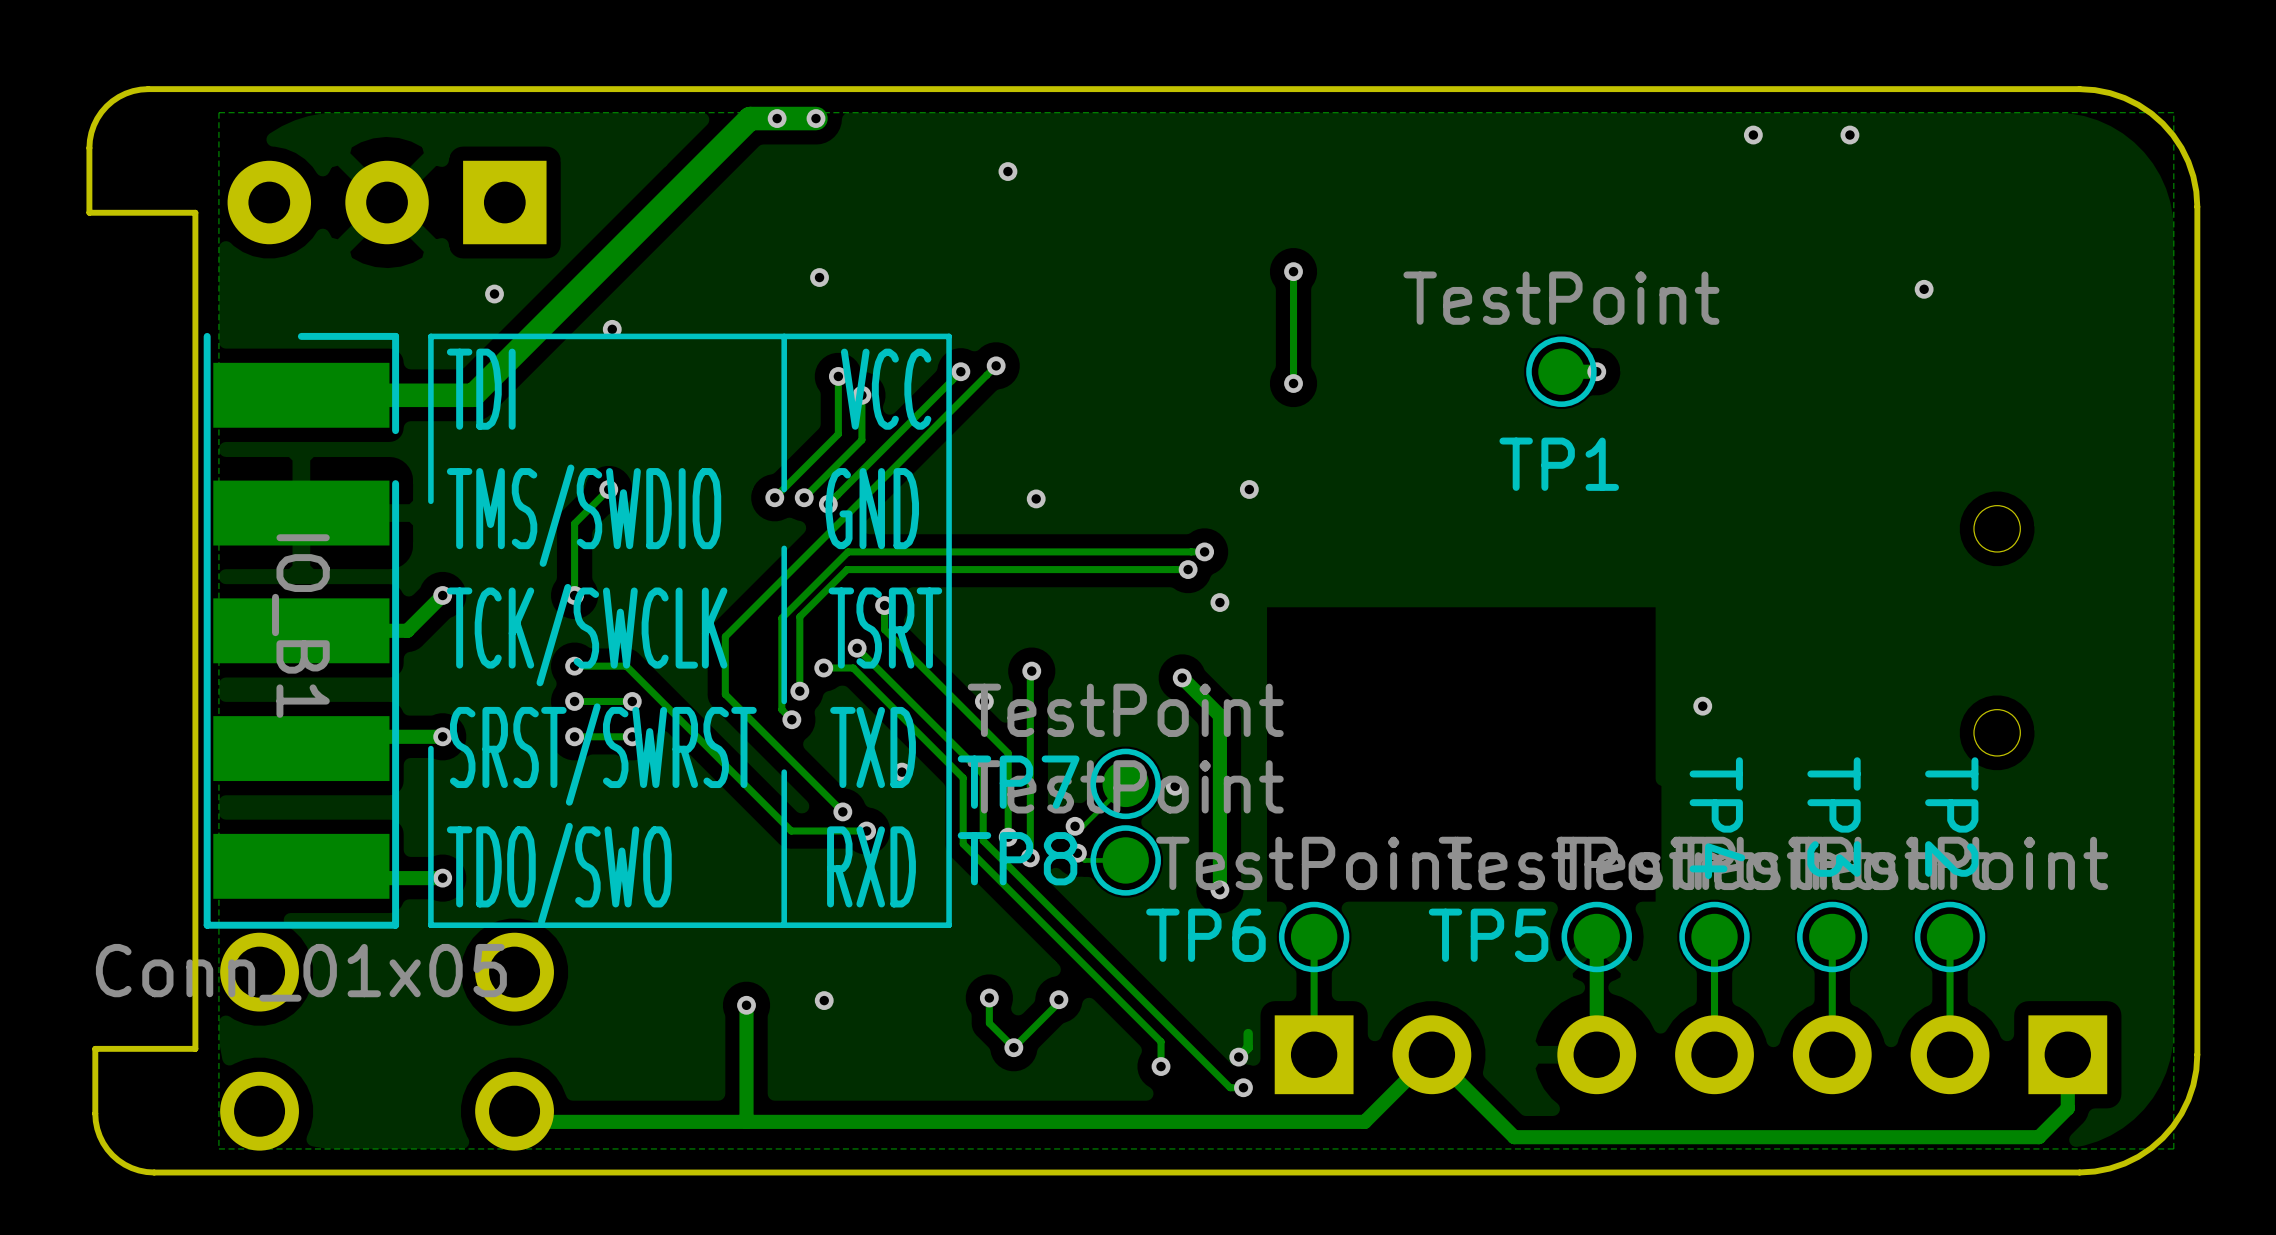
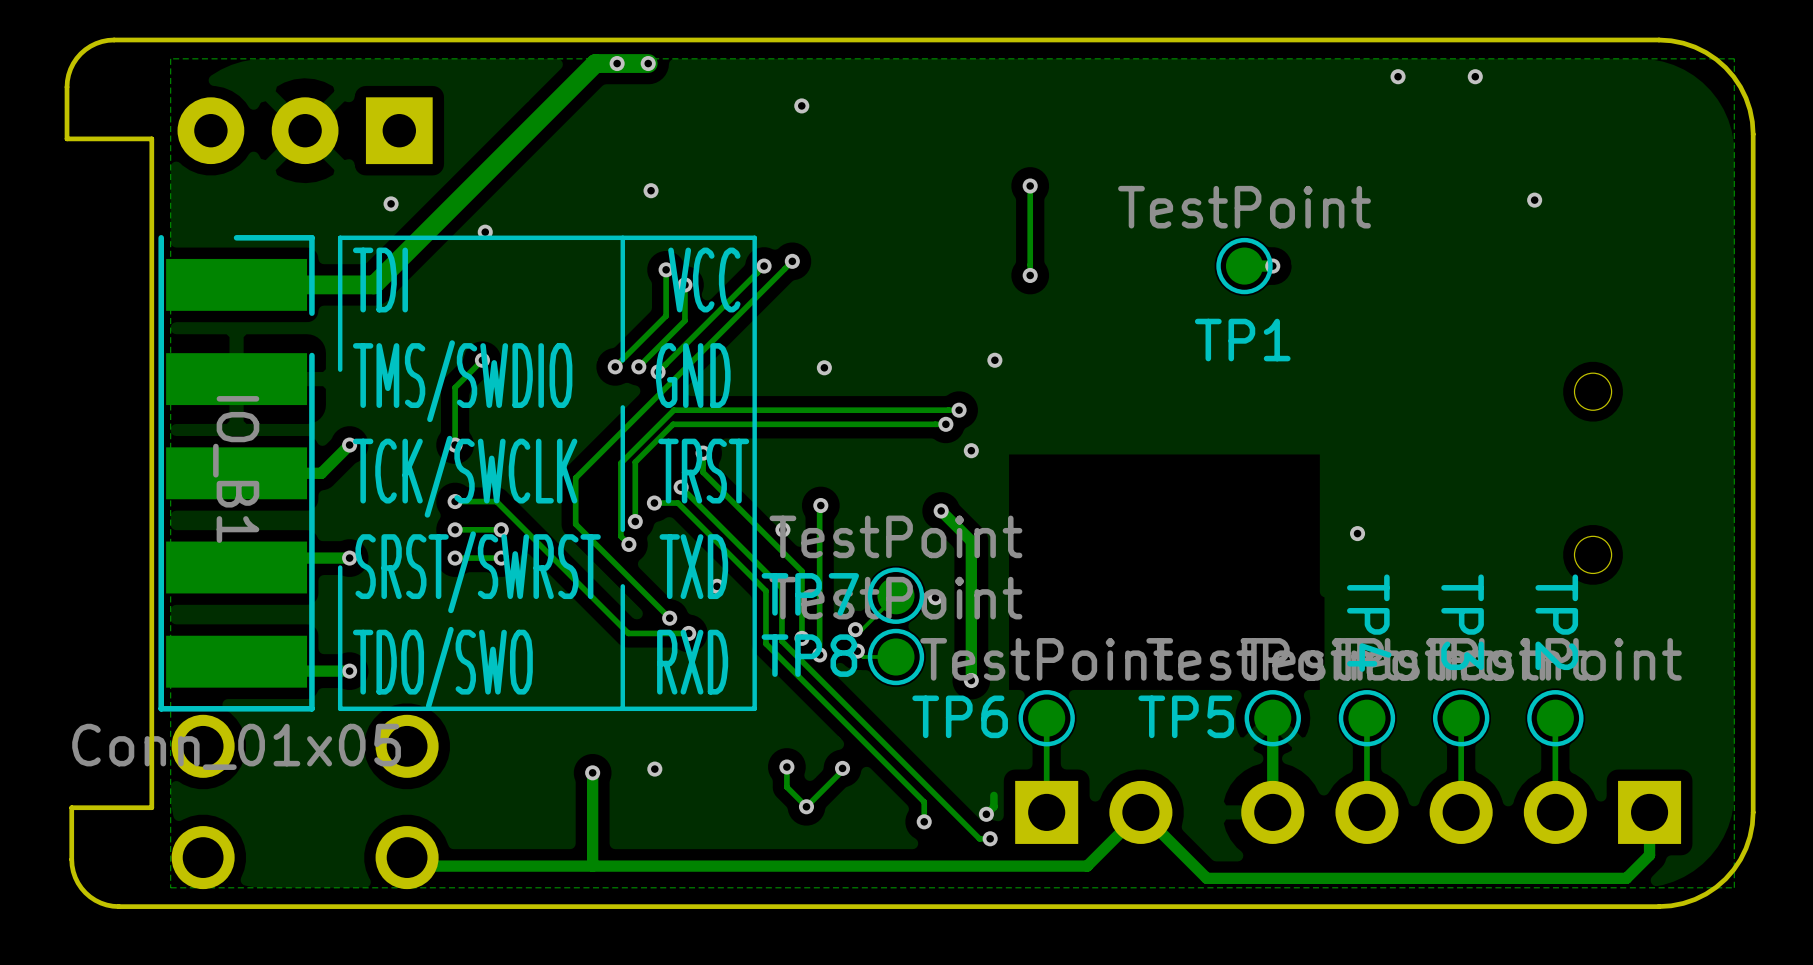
text: TCK/SWCLK TSRT (694, 635) -> TCK/SWCLK TRST (551, 476)

